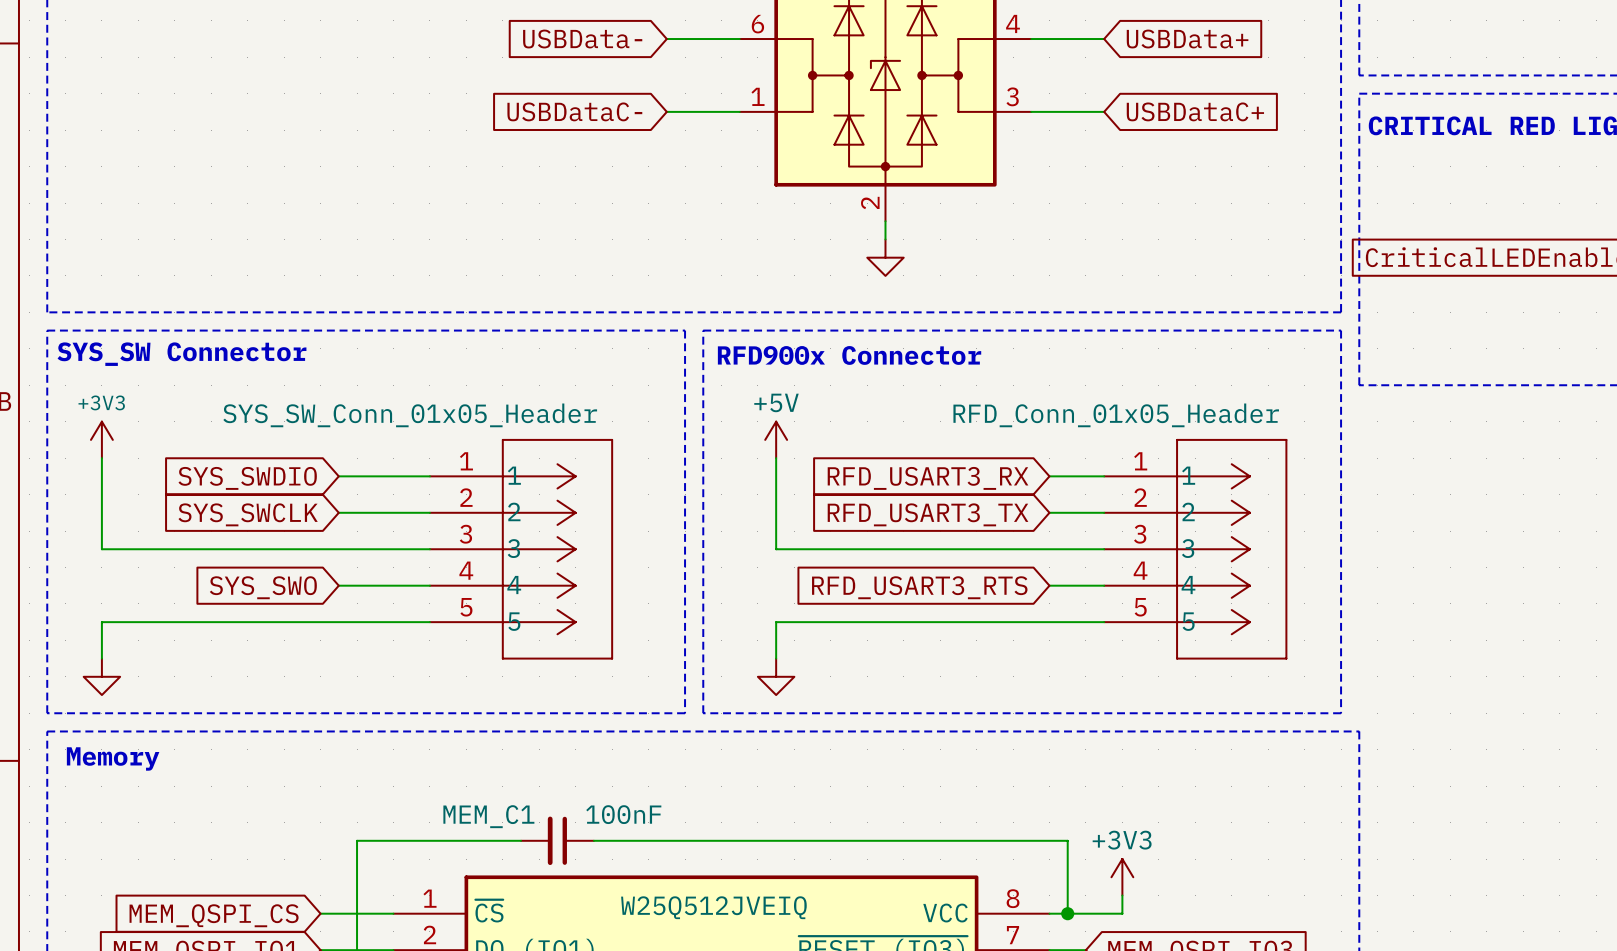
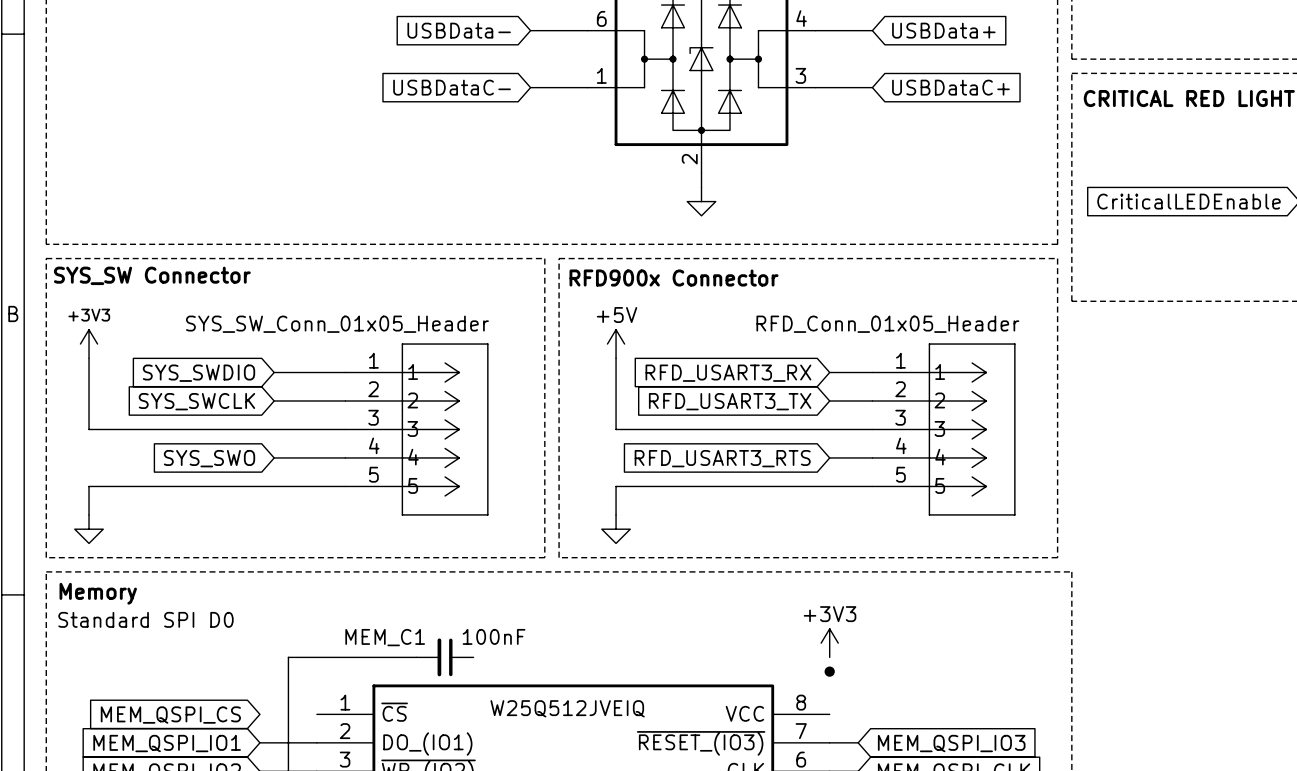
text: none -> Standard SPI D0 (145, 619)
wire: (593, 840) (1067, 840) (1067, 913) -> none
power symbol position: +3V3 (1122, 877) -> +3V3 (829, 643)
wire: (1122, 895) (1122, 913) (1049, 913) -> none
wire: (320, 913) (393, 913) -> none
junction position: (1067, 913) -> (829, 671)

